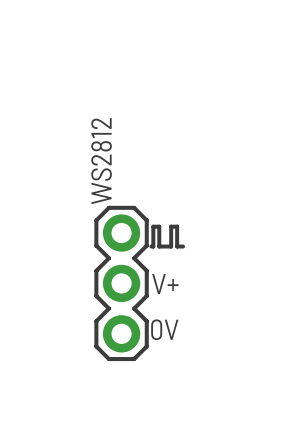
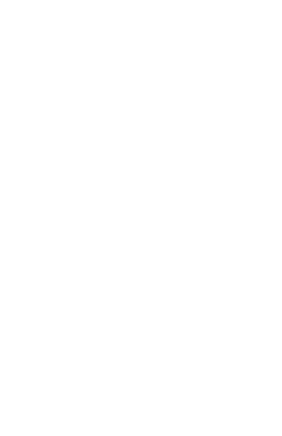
text: WS2812 (101, 161) -> none
line: (183, 246) (177, 246) (177, 226) (171, 226) (171, 246) (159, 246) (159, 226) (153, 226) (153, 246) (151, 246) -> none
part: (121, 283) -> none
text: V+ (165, 284) -> none
text: 0V (164, 329) -> none

